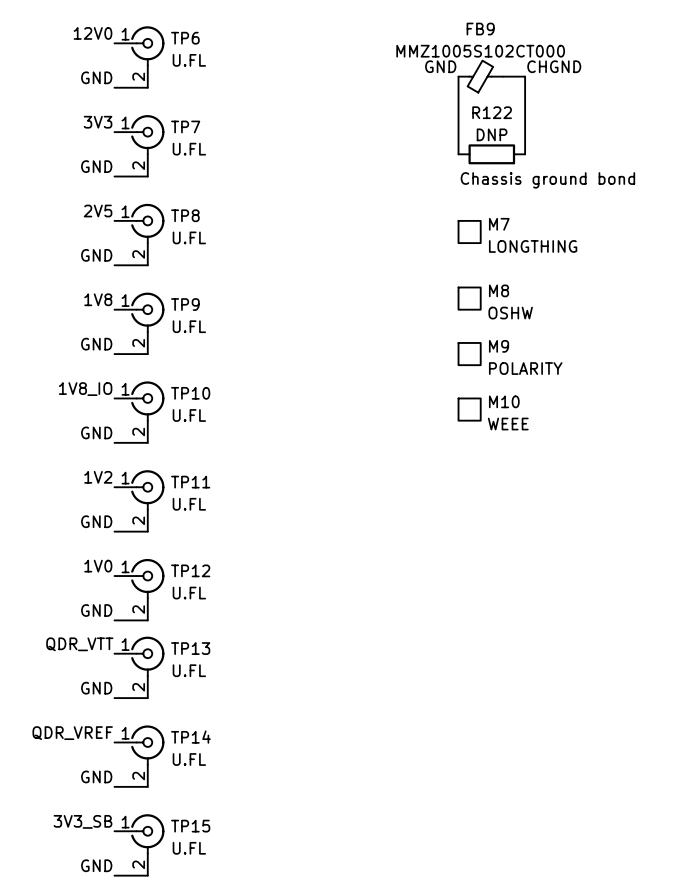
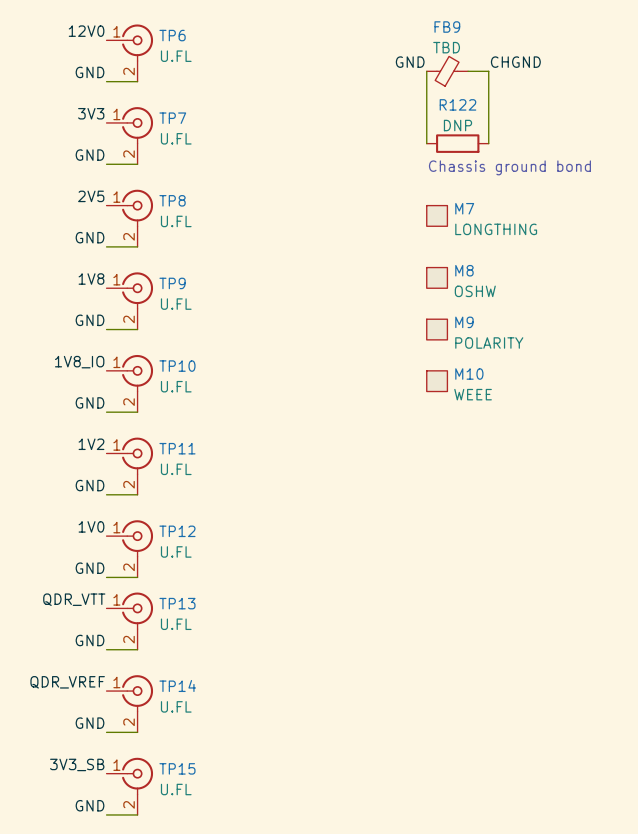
FB9 value: MMZ1005S102CT000 (480, 51) -> TBD (446, 47)

